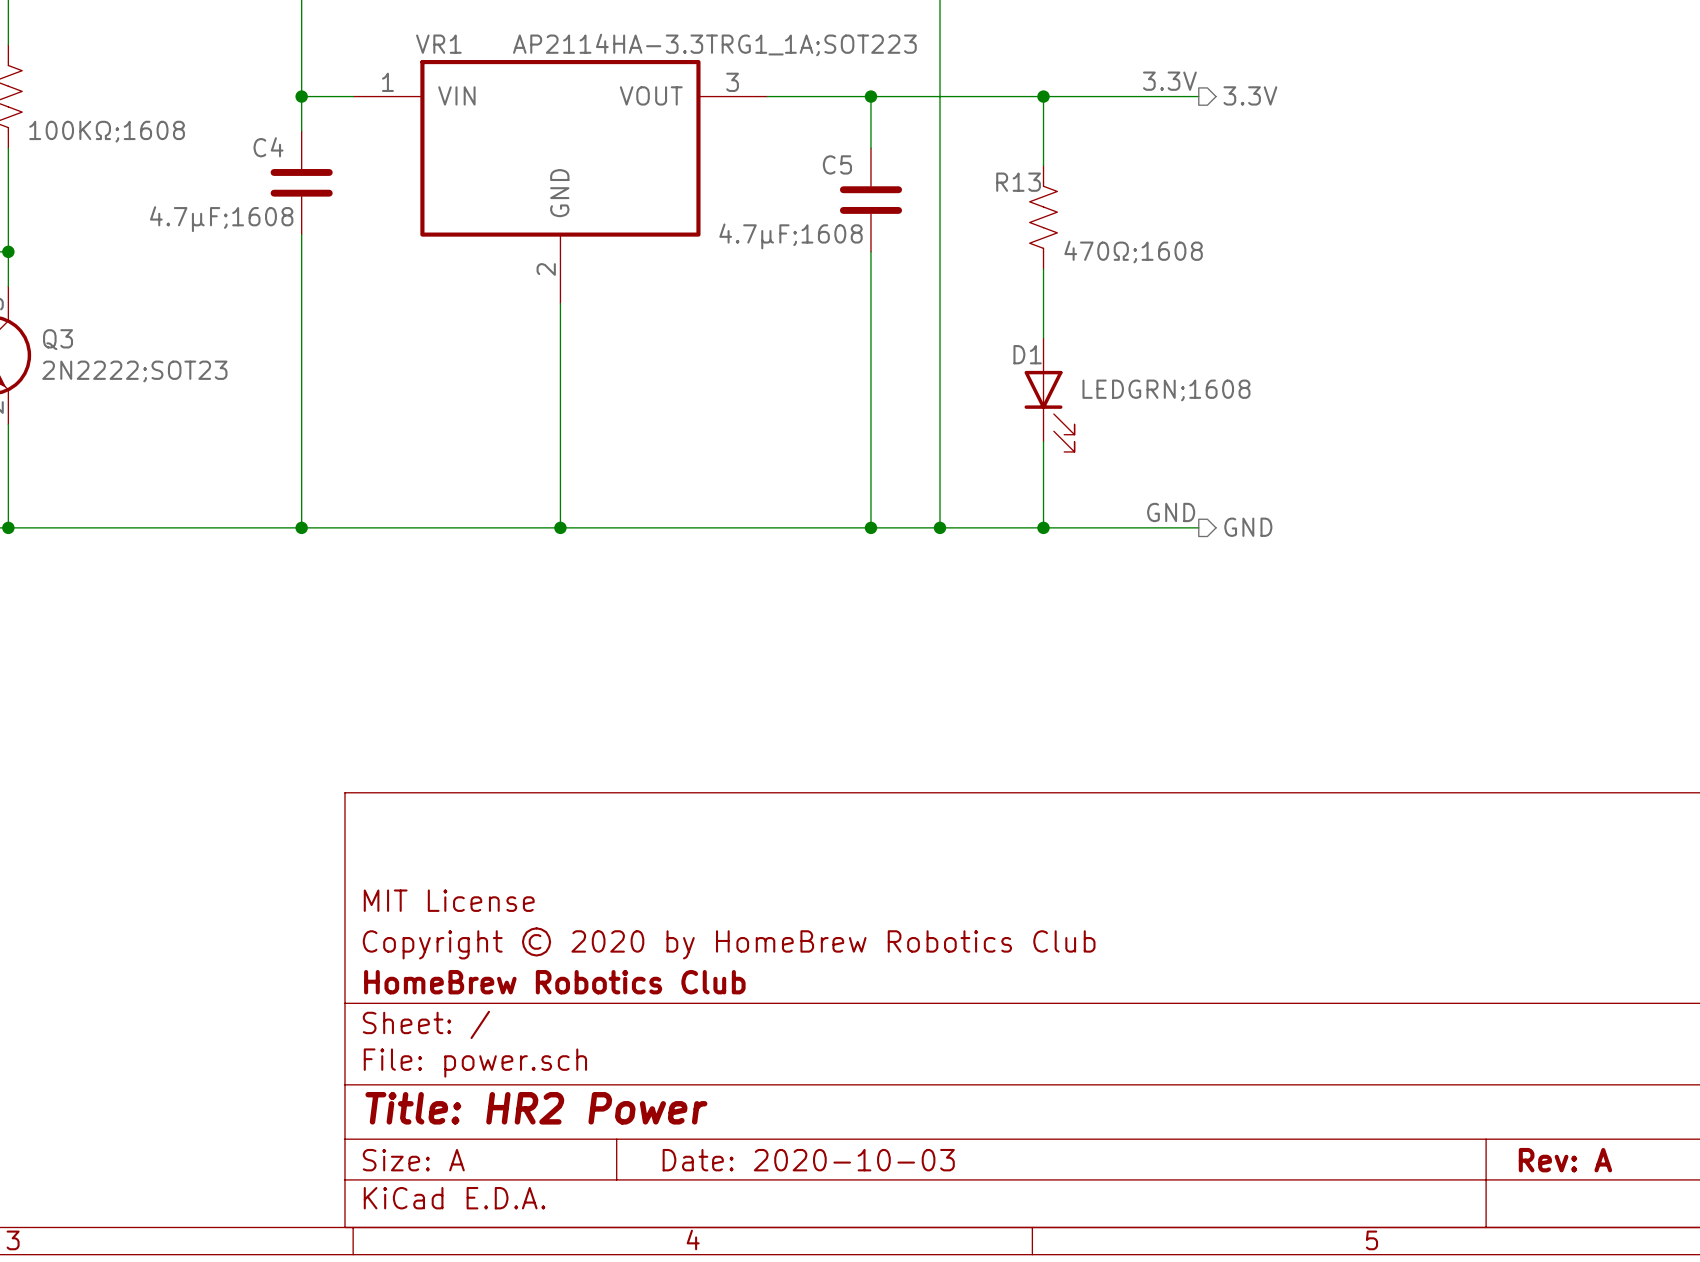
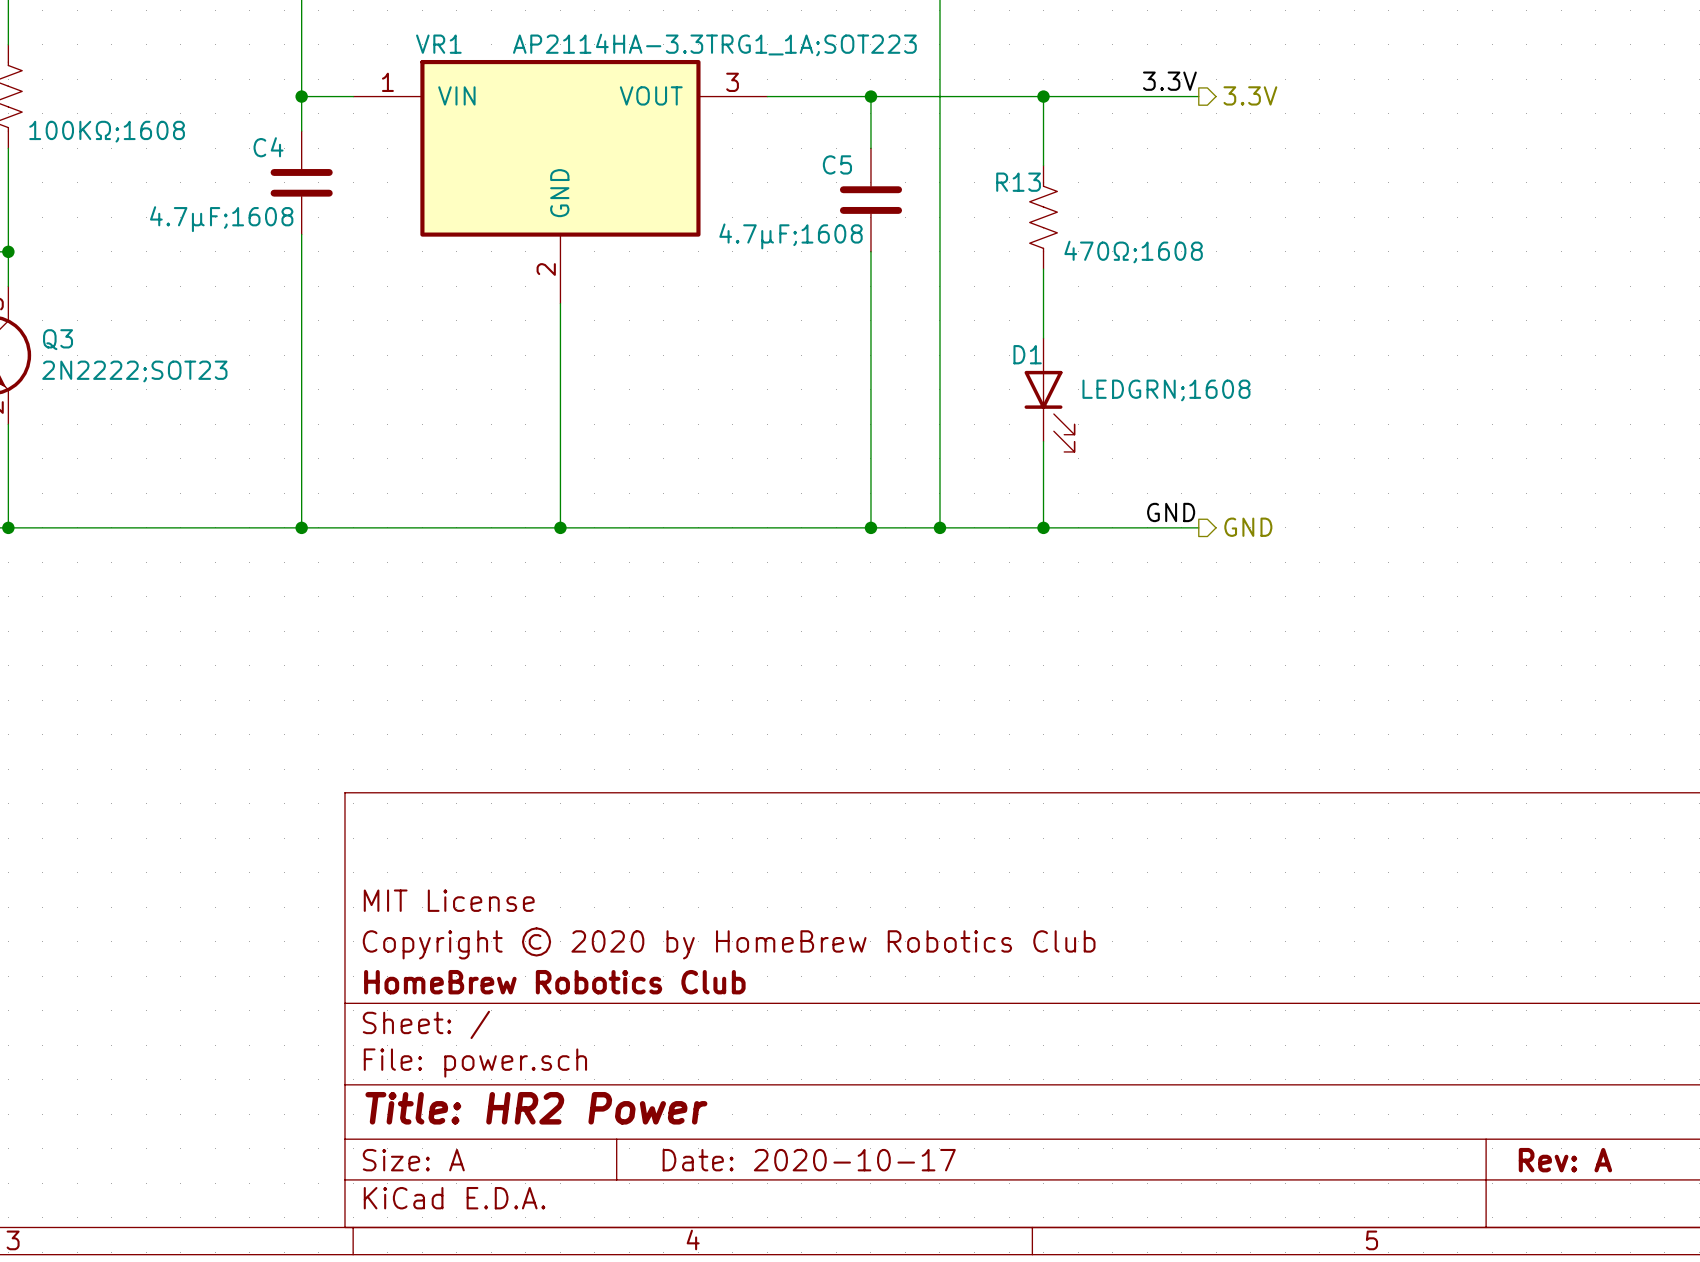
title block: Date: 2020-10-03 (808, 1160) -> Date: 2020-10-17 (809, 1160)

